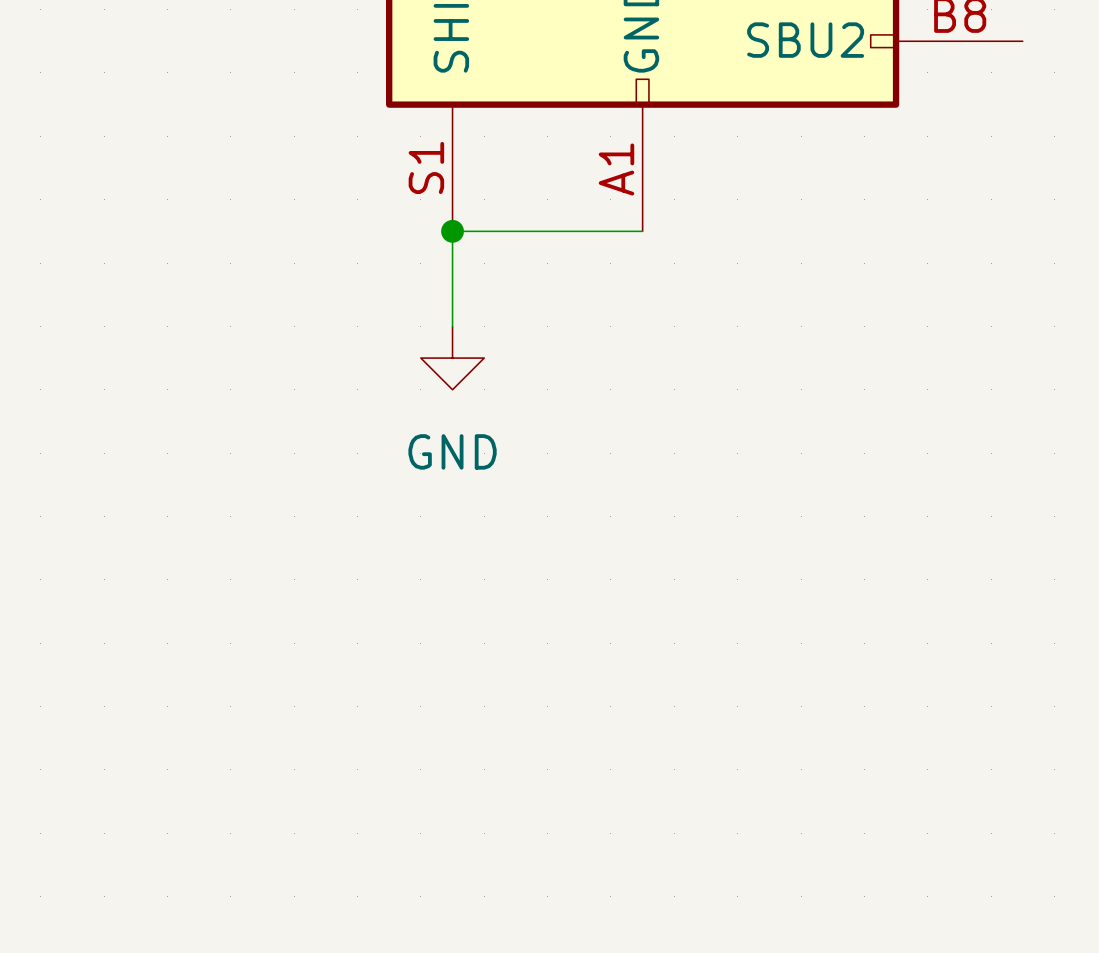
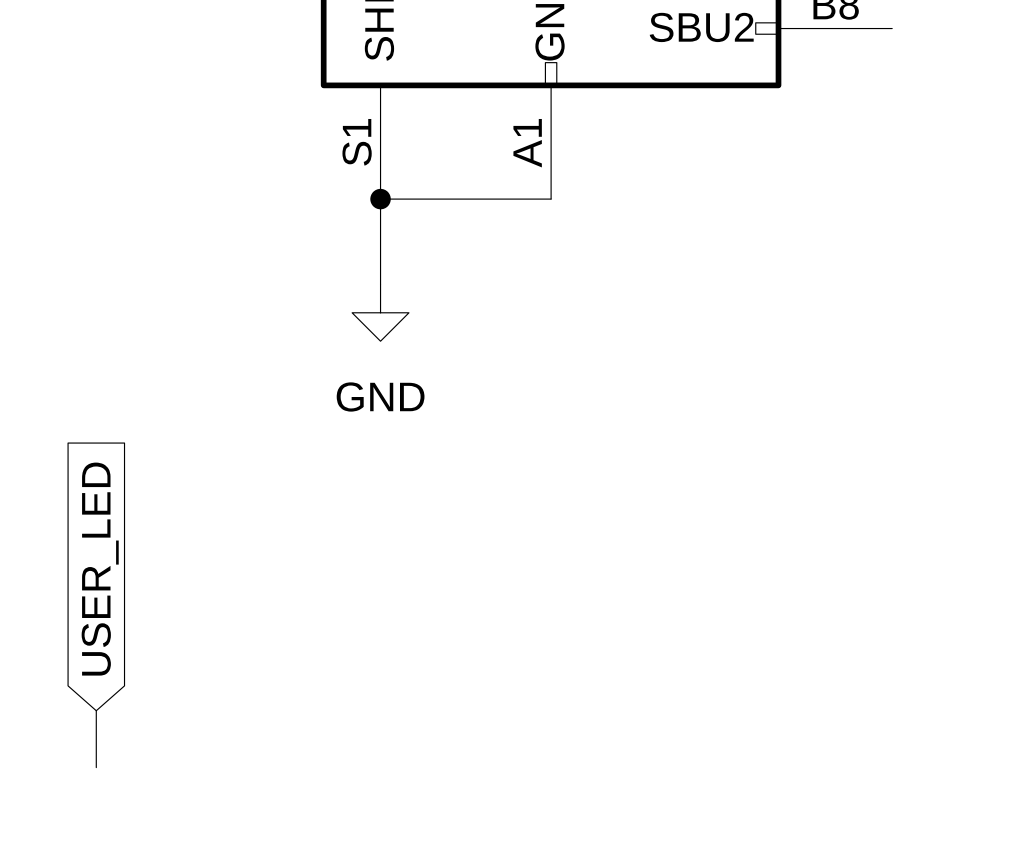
global label: none -> USER_LED (100, 569)
wire: none -> (96, 710) (96, 767)

